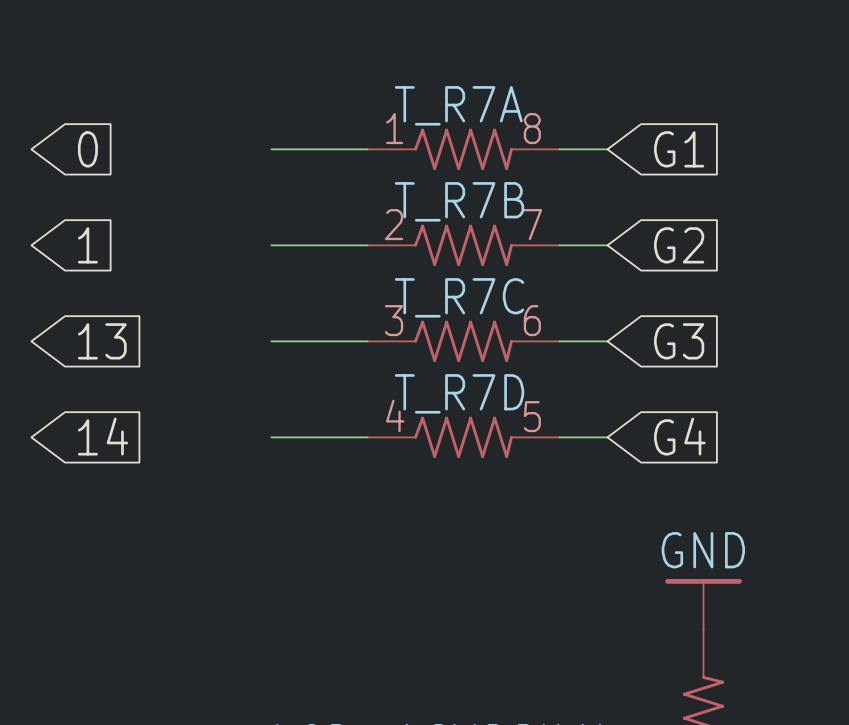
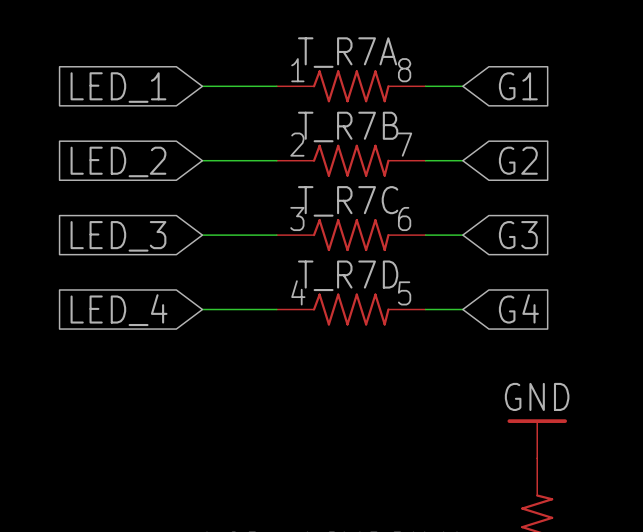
global label: 0 (87, 149) -> none
global label: none -> LED_1 (118, 87)
global label: 1 (87, 245) -> none
global label: none -> LED_2 (118, 161)
global label: 13 (102, 341) -> none
global label: none -> LED_3 (118, 236)
global label: 14 (103, 436) -> none
global label: none -> LED_4 (119, 310)

